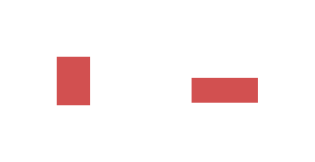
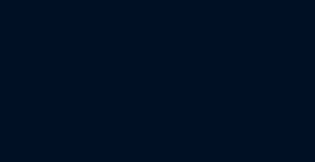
drawing: [56, 56, 91, 106] -> none
drawing: [191, 77, 258, 103] -> none

